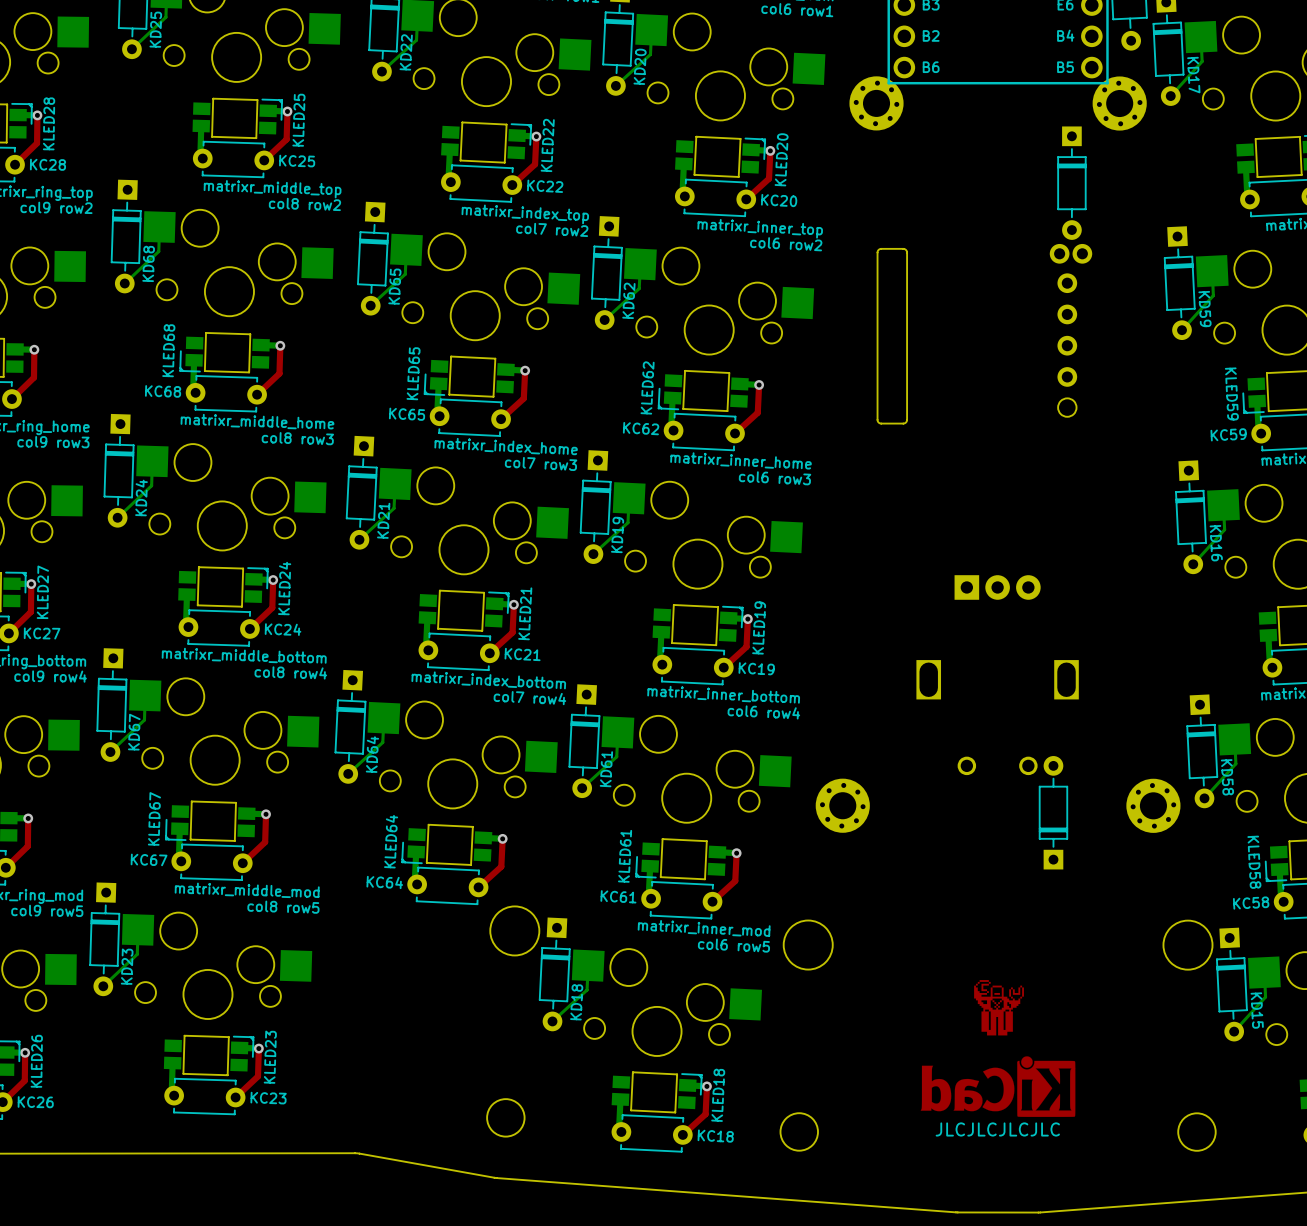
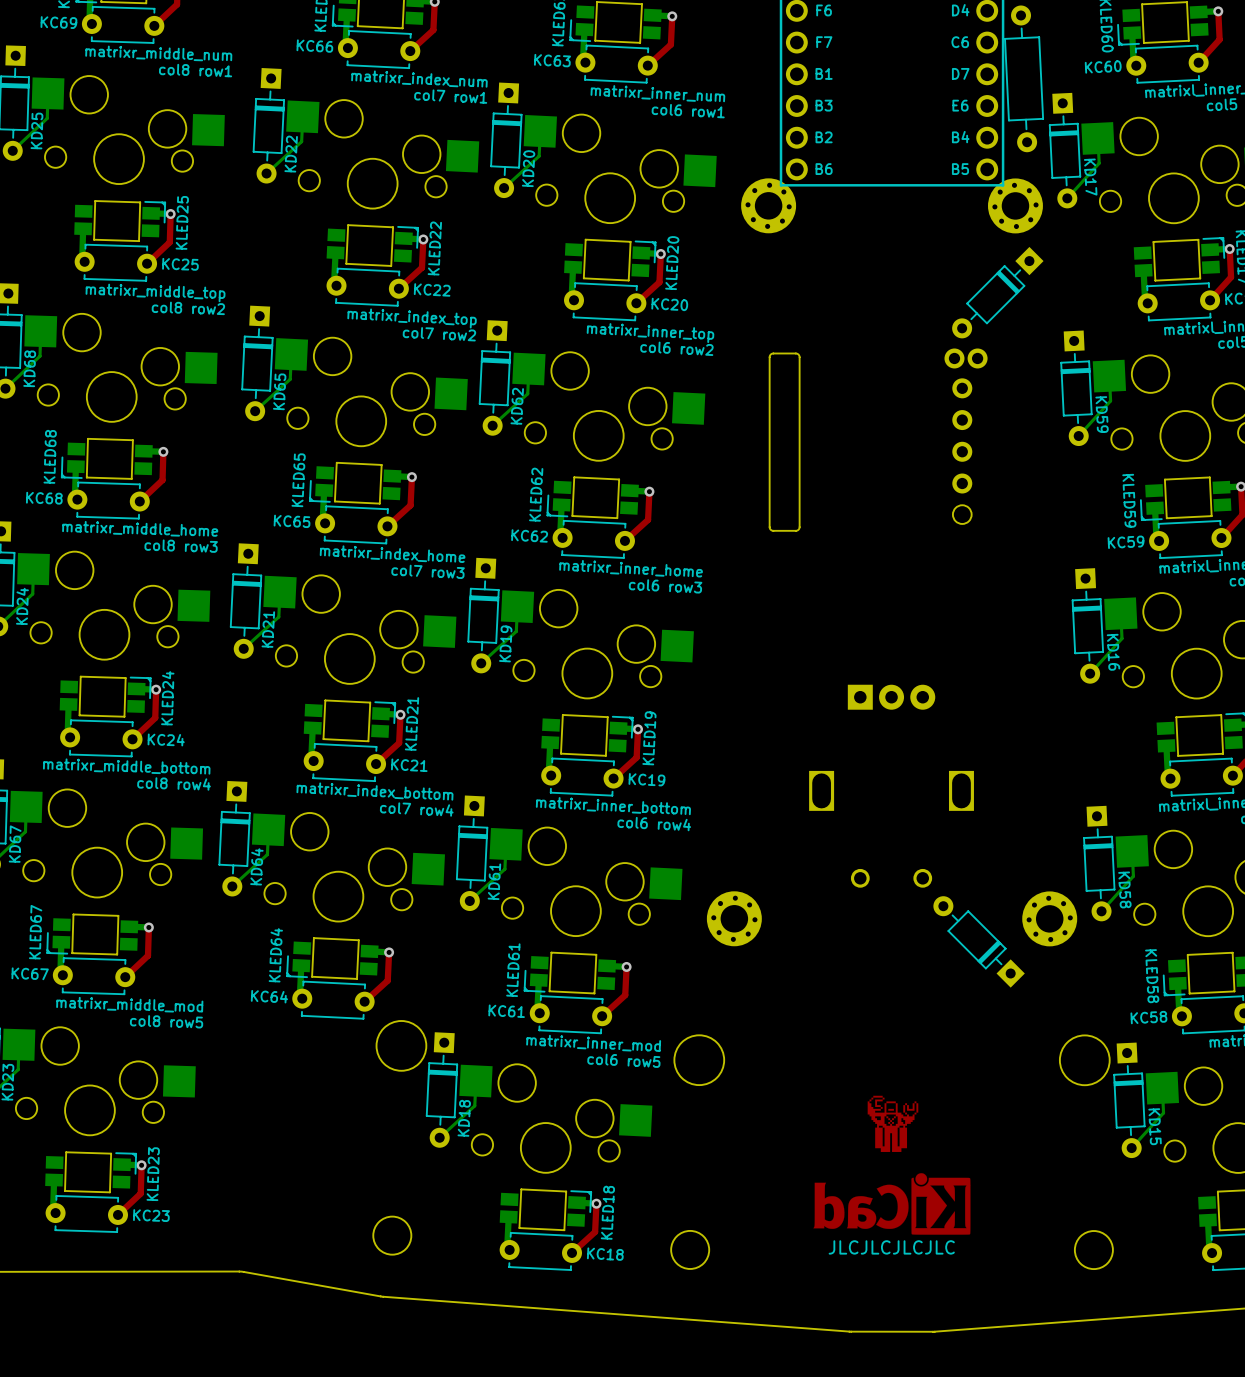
part: (1071, 183) -> none
part: none -> (997, 292)
part: (1053, 812) -> none
part: none -> (979, 941)

